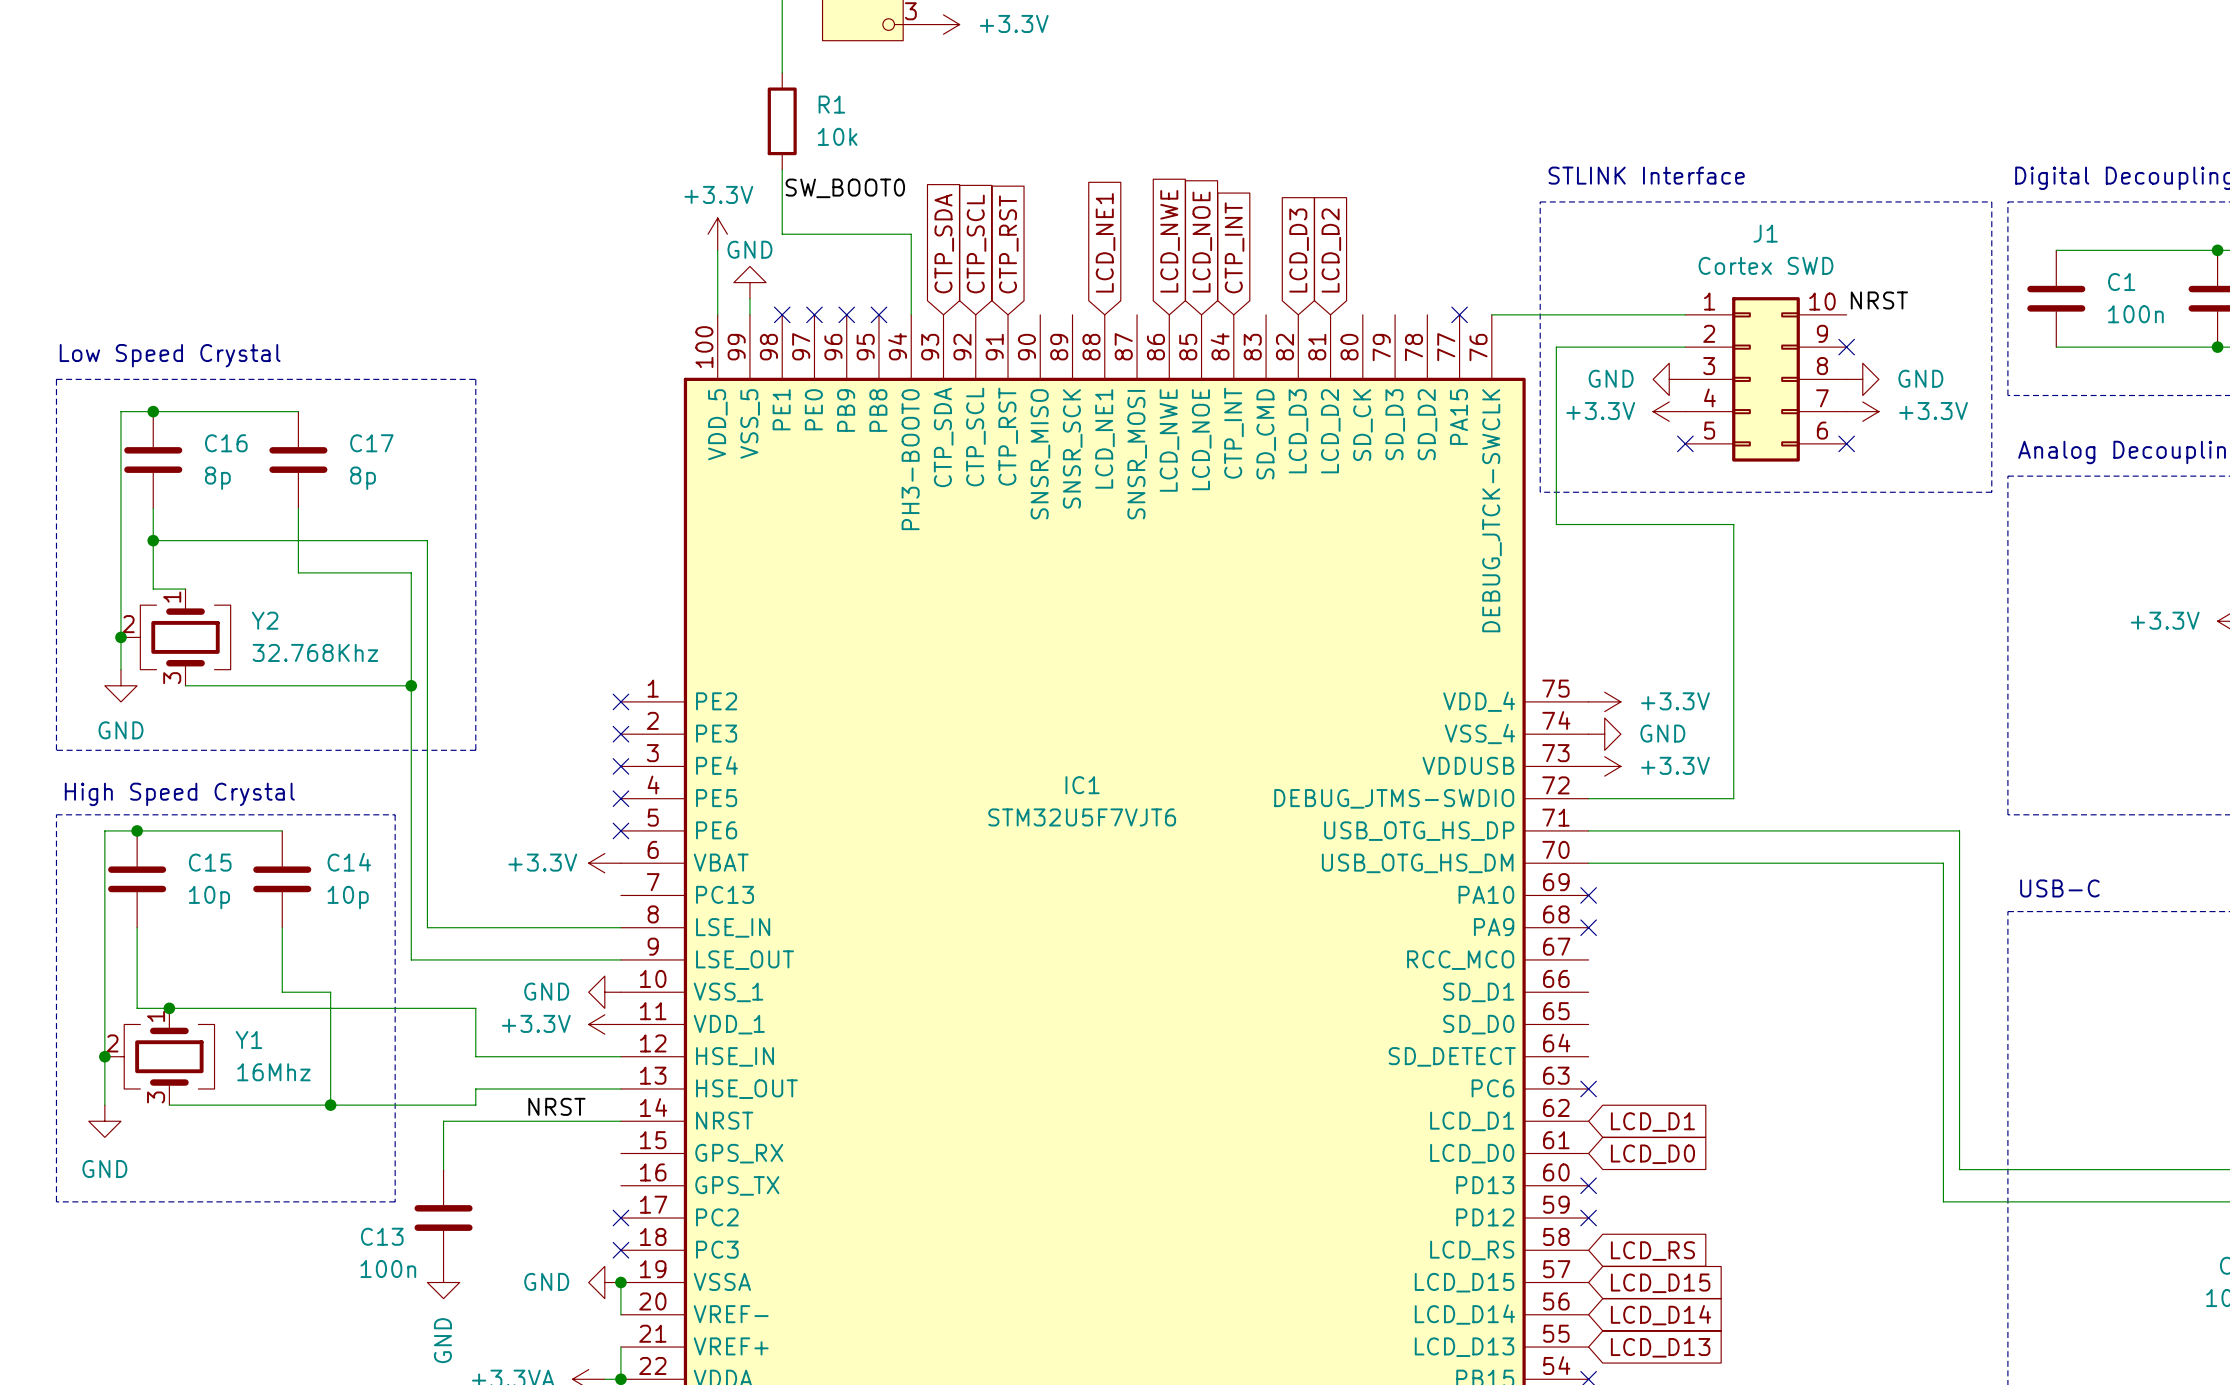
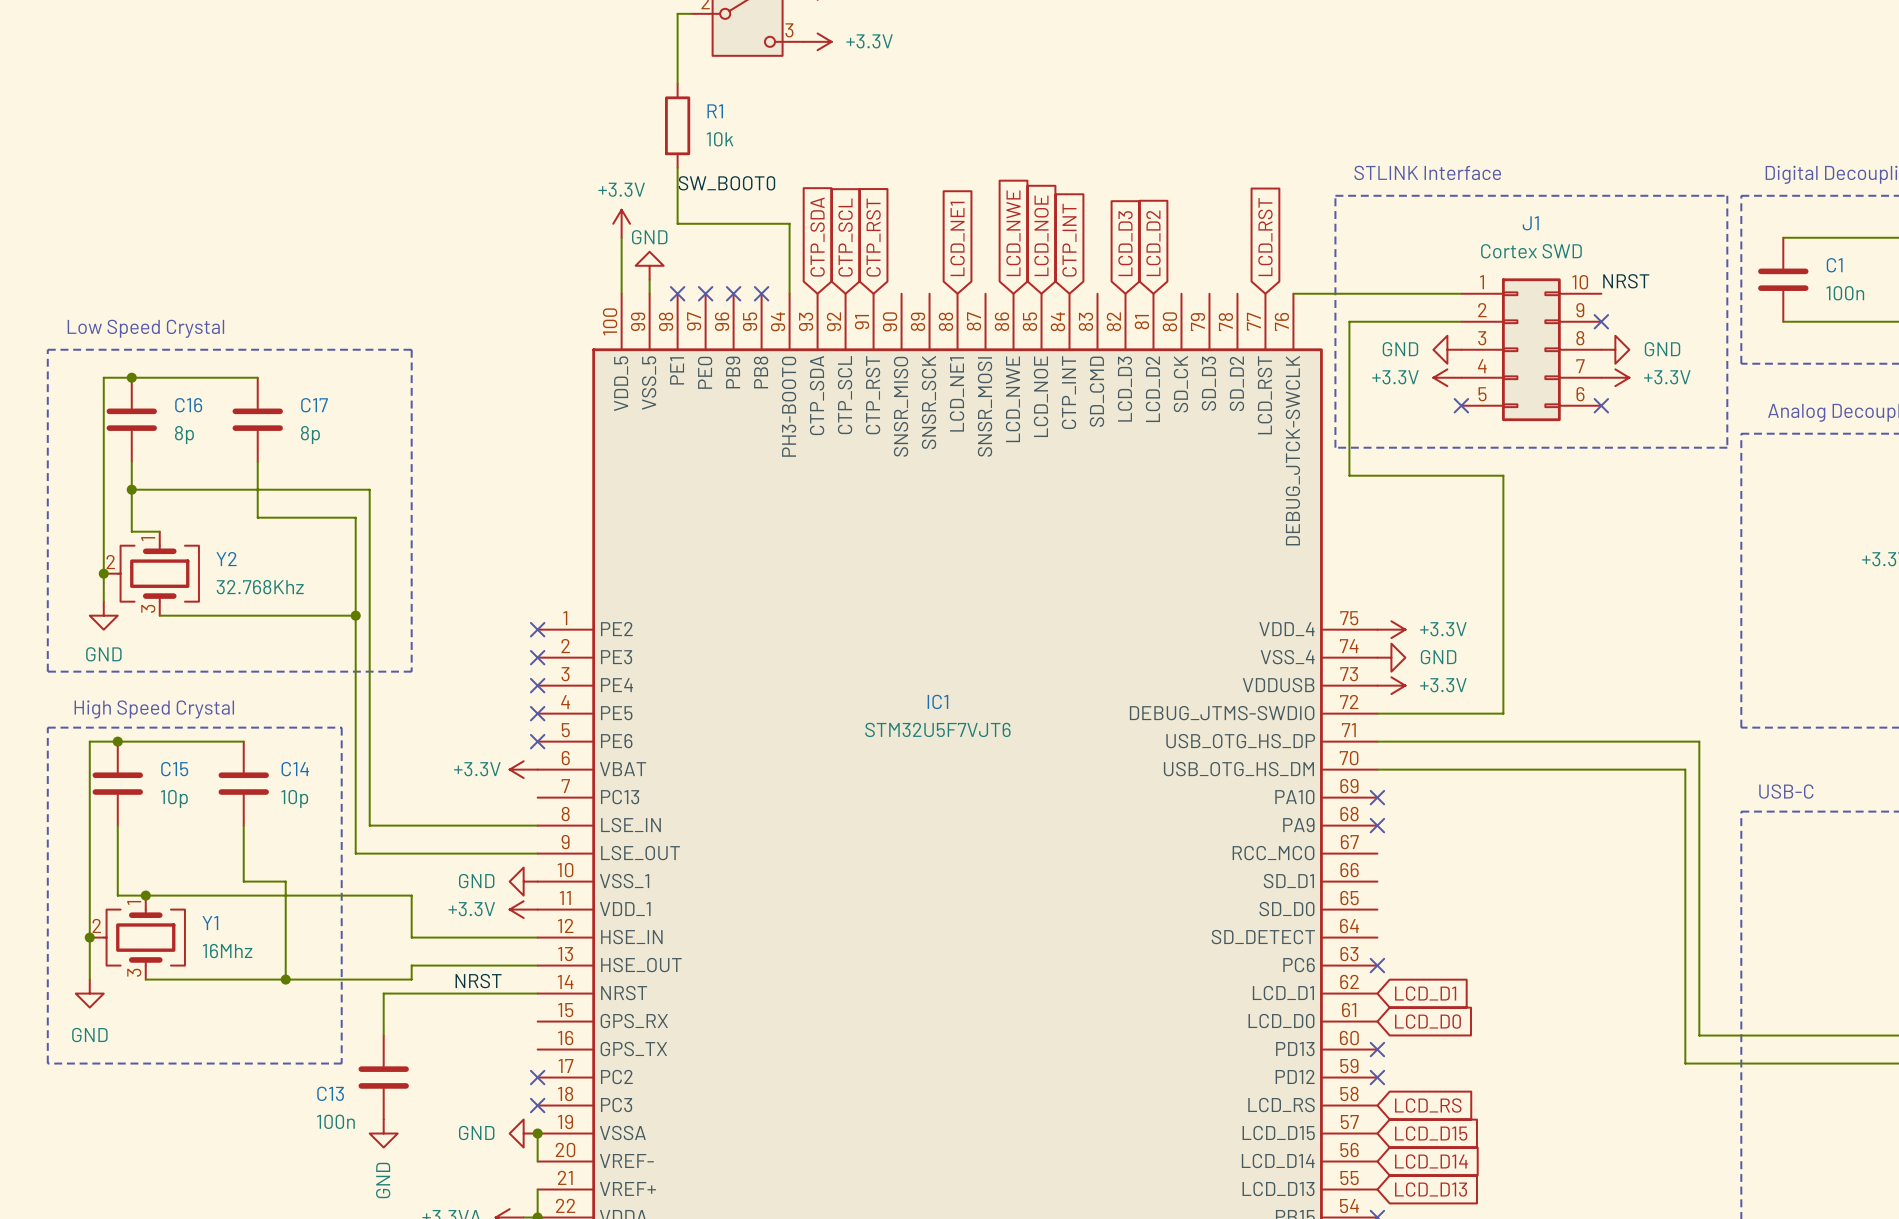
global label: none -> LCD_RST (1265, 237)
no-connect mark: (1459, 314) -> none
IC1 pin name: PA15 (1458, 417) -> LCD_RST (1264, 395)

